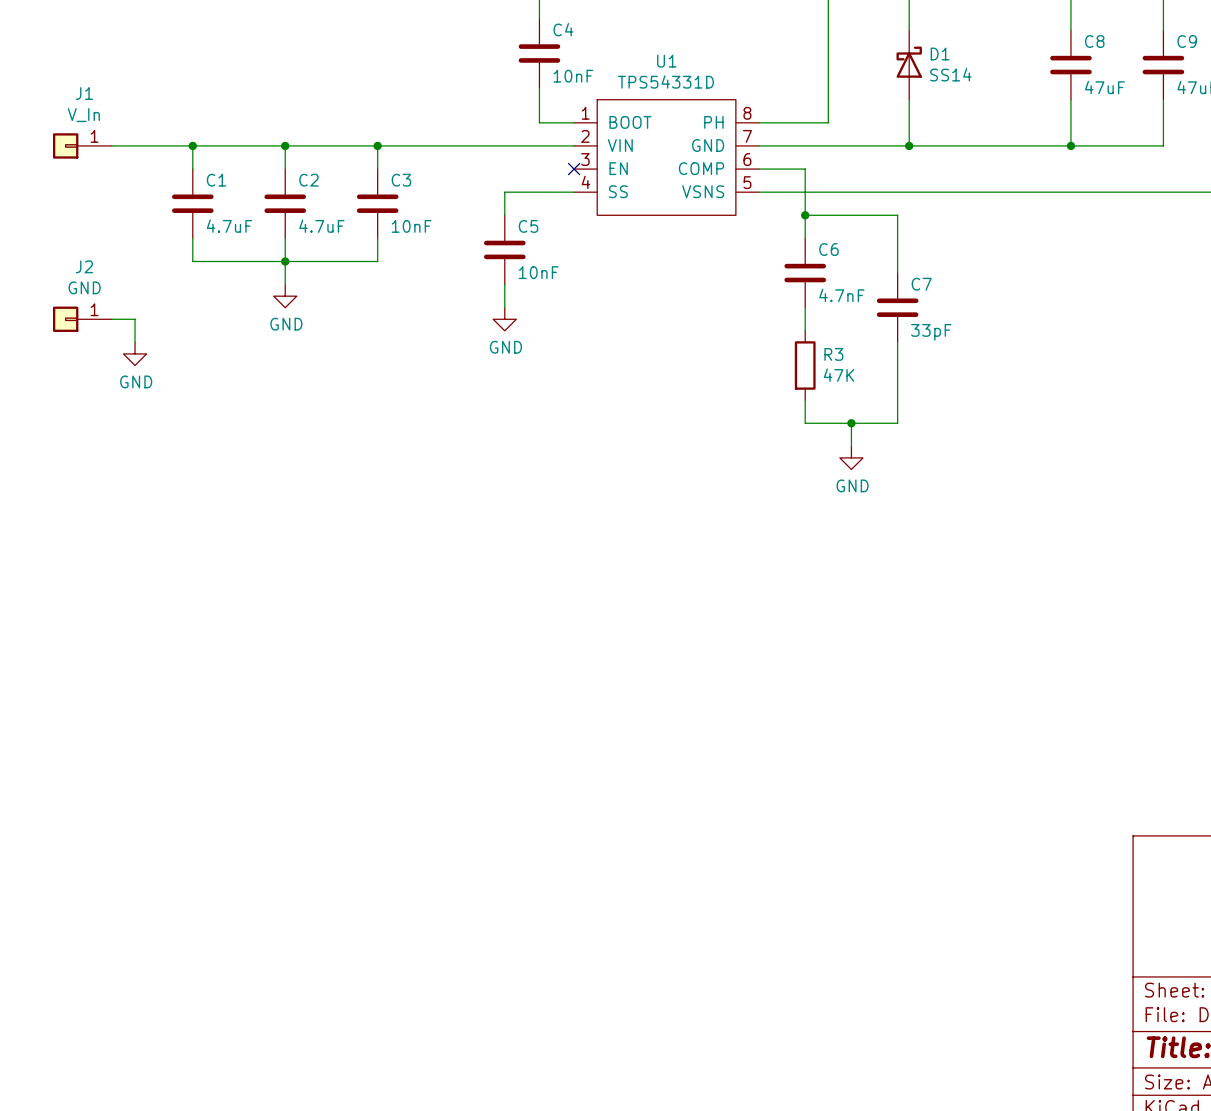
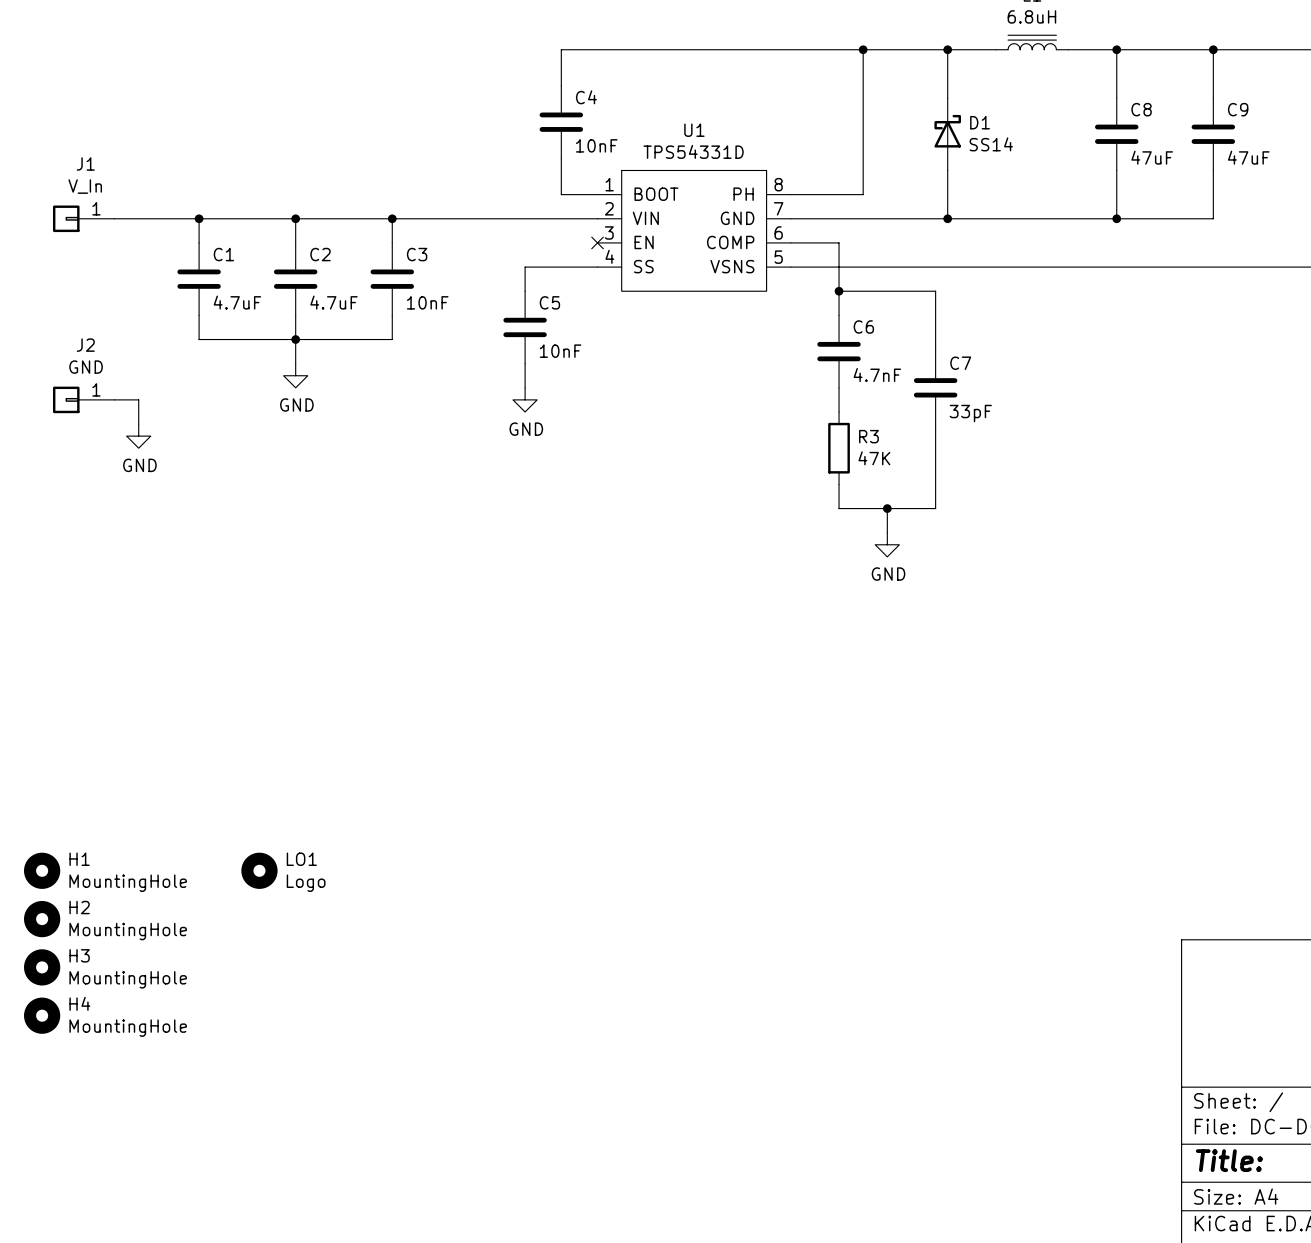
H1: none -> MountingHole (42, 870)
LO1: none -> Logo (259, 870)
H2: none -> MountingHole (42, 919)
H3: none -> MountingHole (42, 967)
H4: none -> MountingHole (42, 1015)

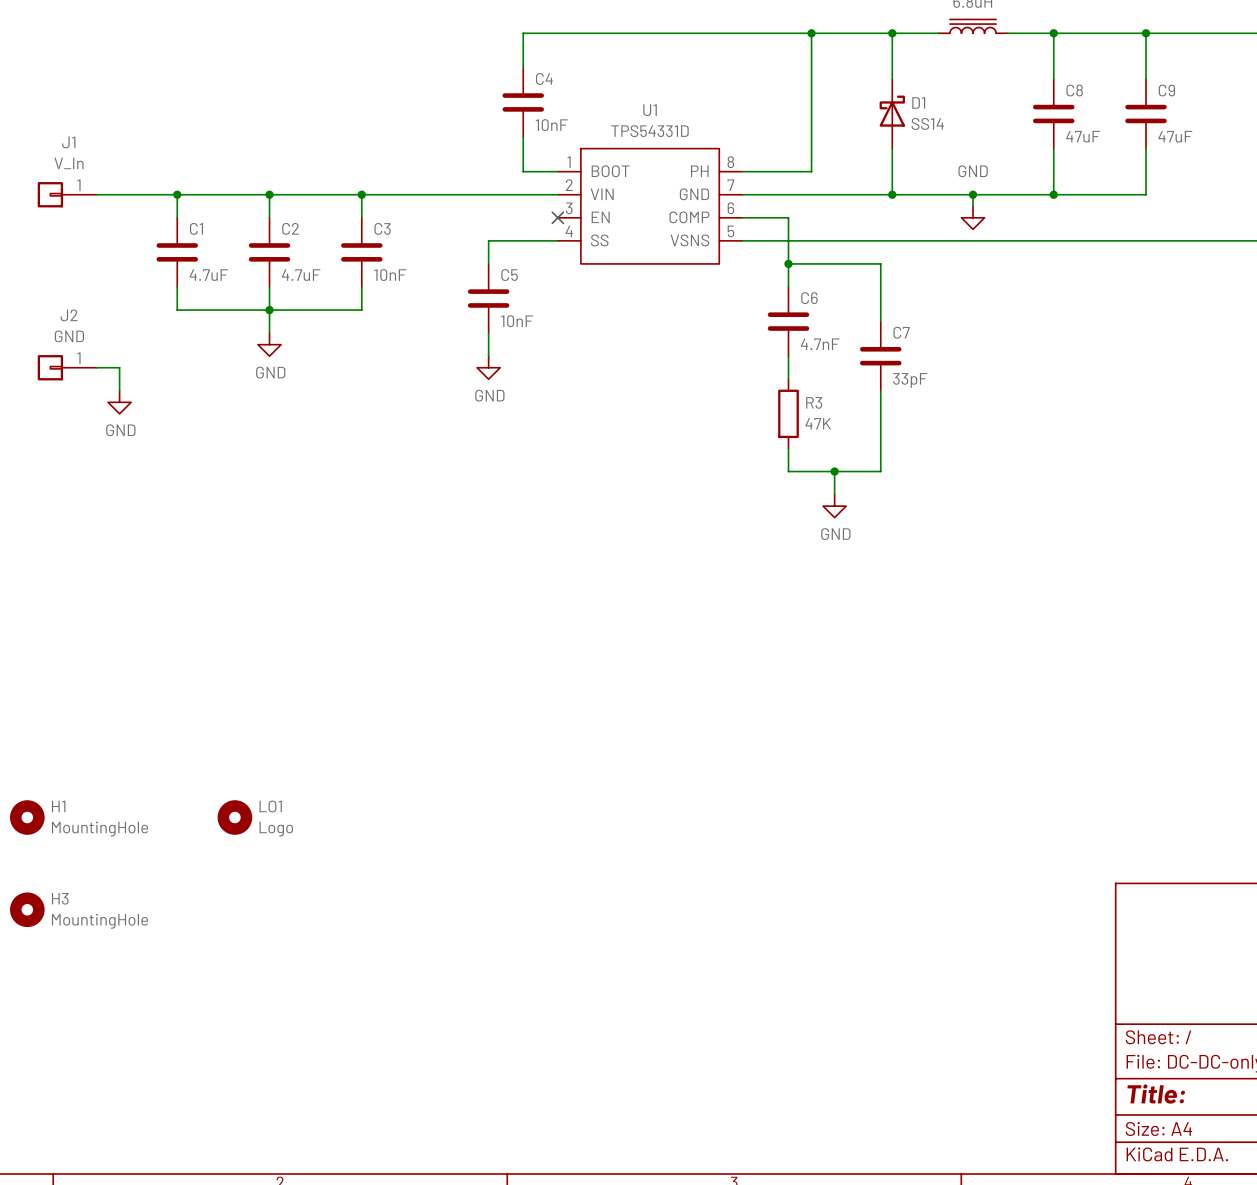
wire: none -> (973, 194) (973, 206)
junction: none -> (973, 194)
power symbol: none -> GND (973, 217)
H2: MountingHole (42, 919) -> none
H4: MountingHole (42, 1015) -> none

